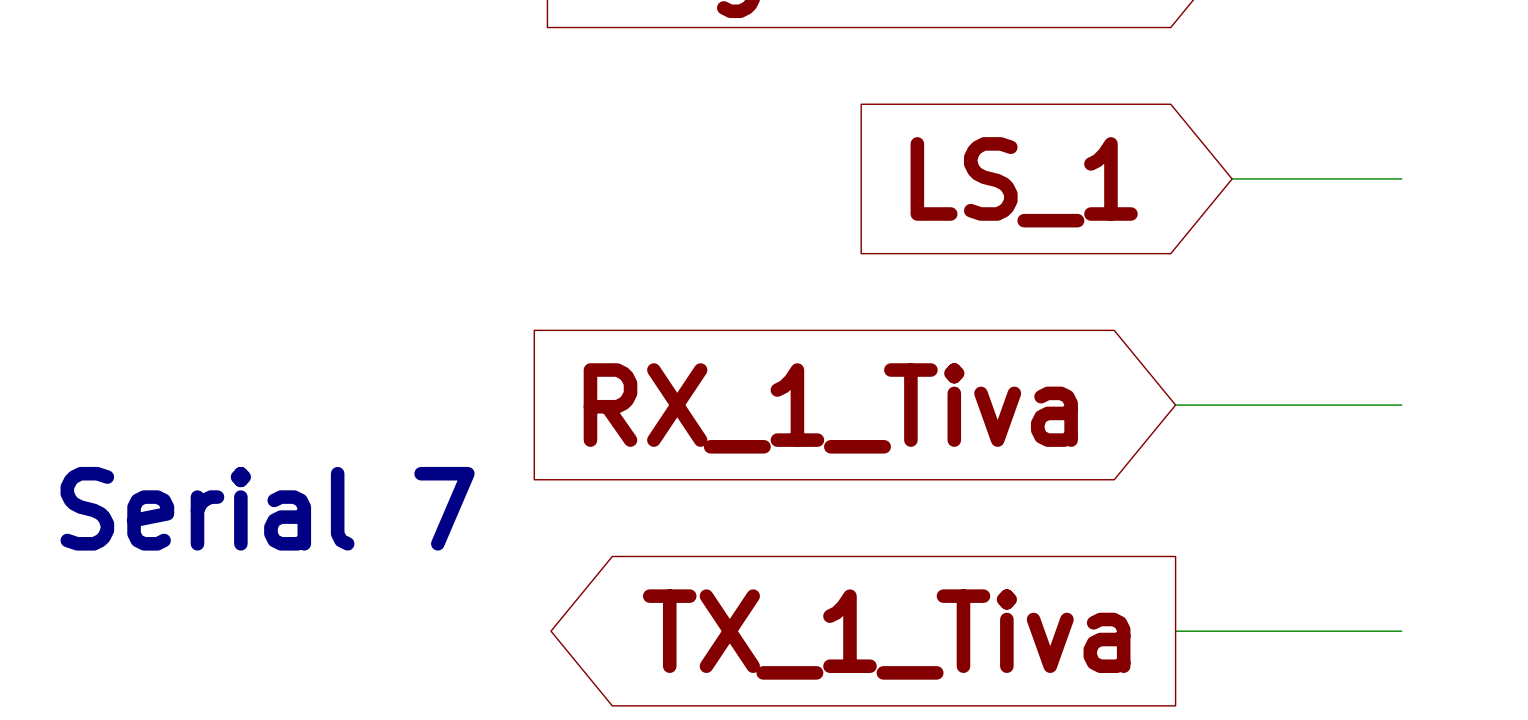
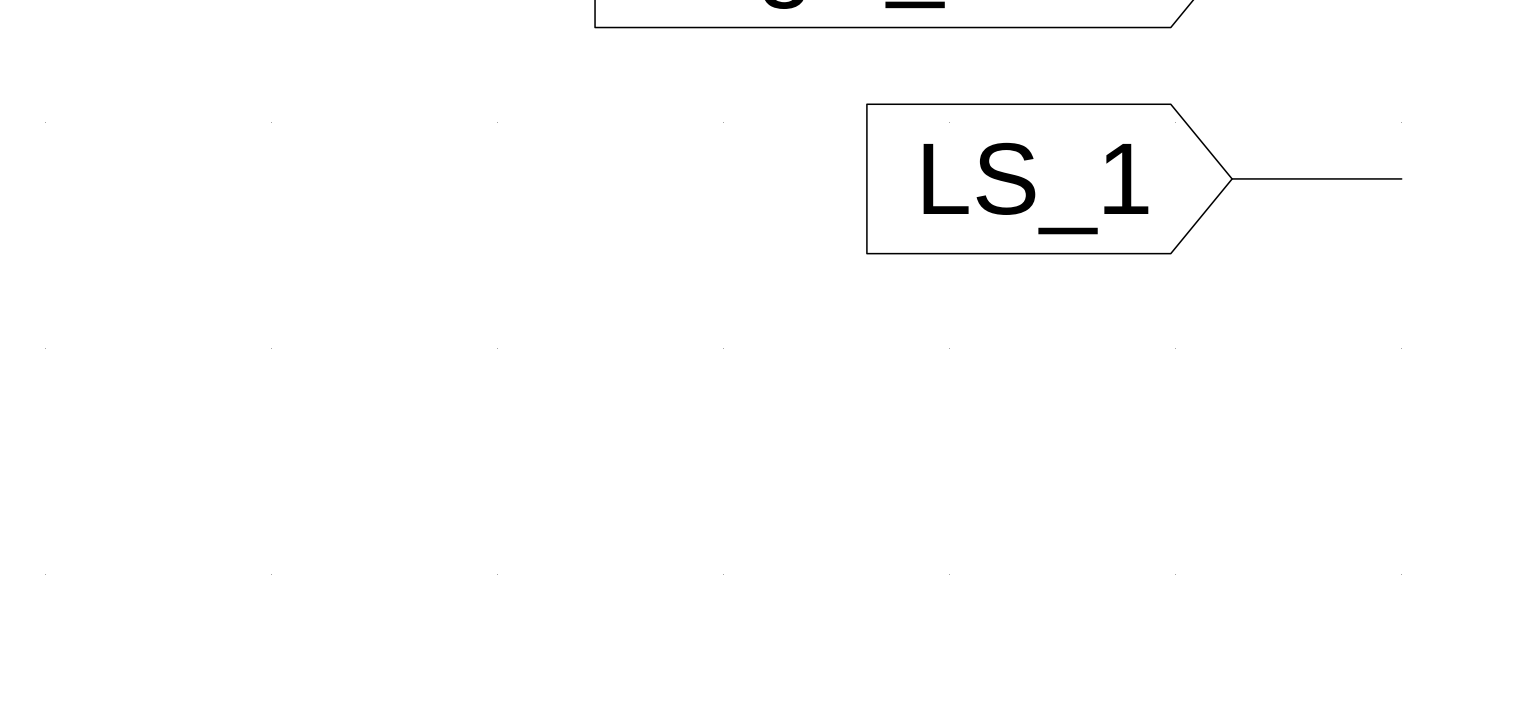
wire: (1175, 405) (1401, 405) -> none
global label: RX_1_Tiva (830, 408) -> none
text: Serial 7 (267, 508) -> none
wire: (1175, 631) (1401, 631) -> none
global label: TX_1_Tiva (886, 634) -> none

